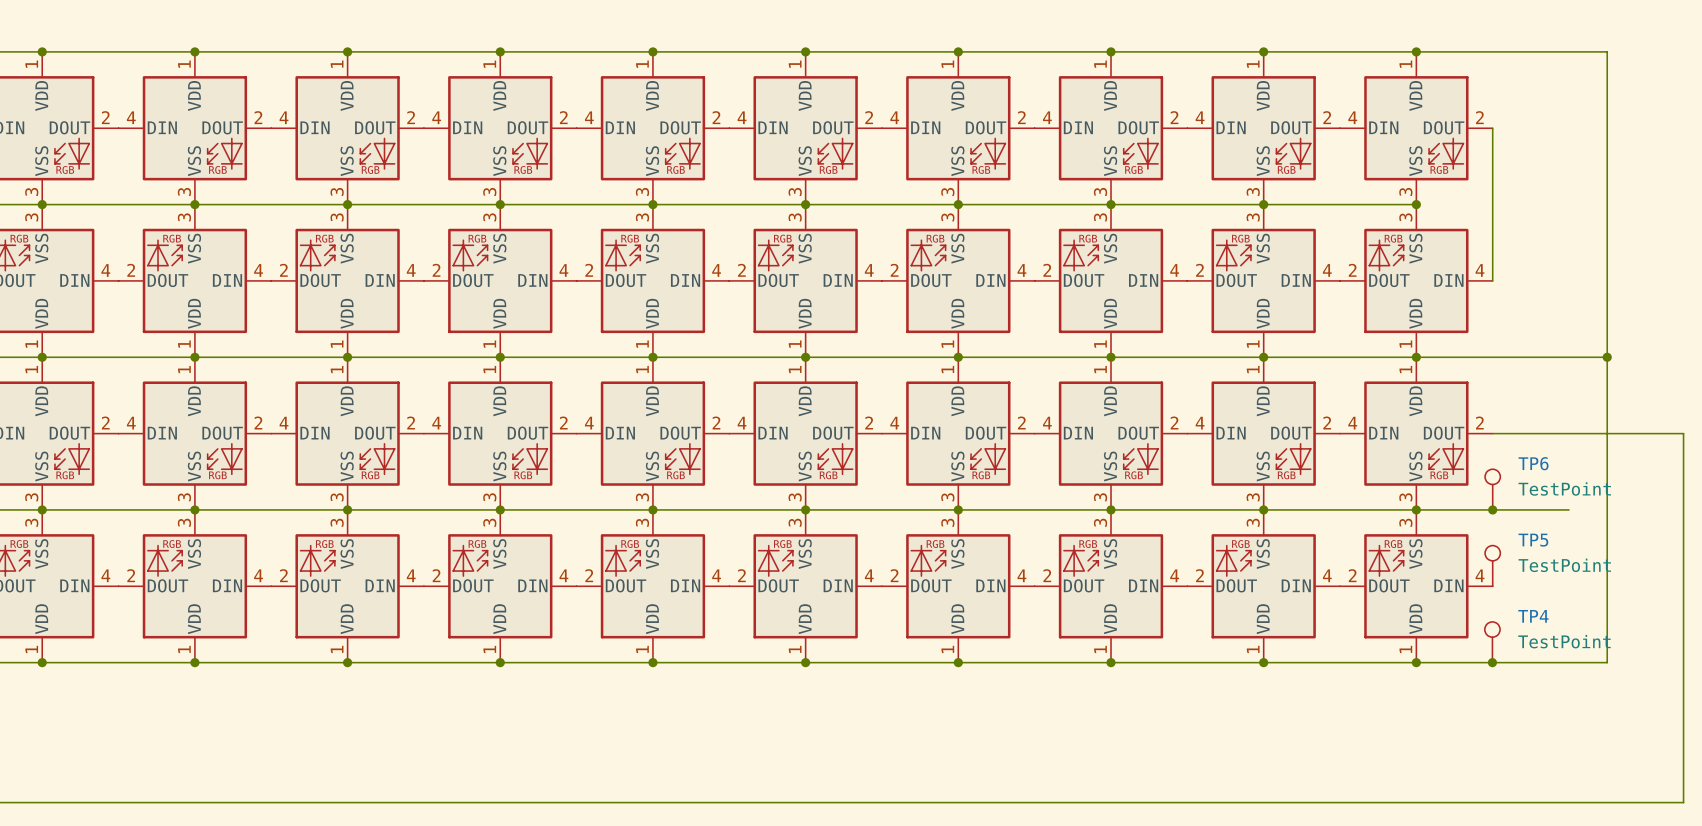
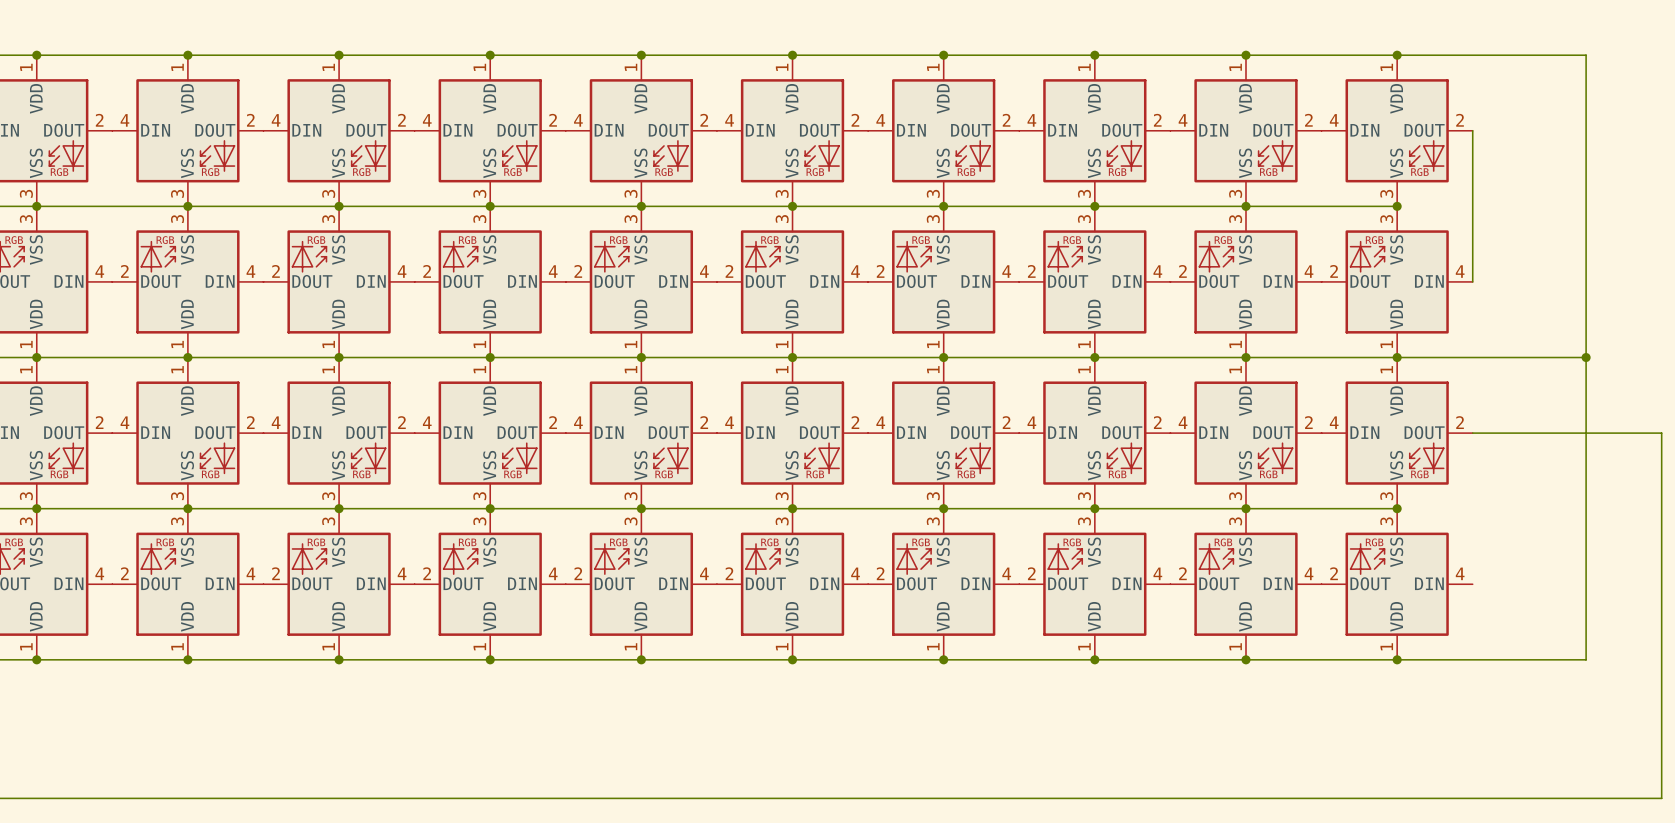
TP6: TestPoint (1492, 489) -> none
wire: (1416, 509) (1569, 509) -> none
junction: (1492, 509) -> none
TP5: TestPoint (1492, 565) -> none
TP4: TestPoint (1492, 642) -> none
junction: (1492, 662) -> none

